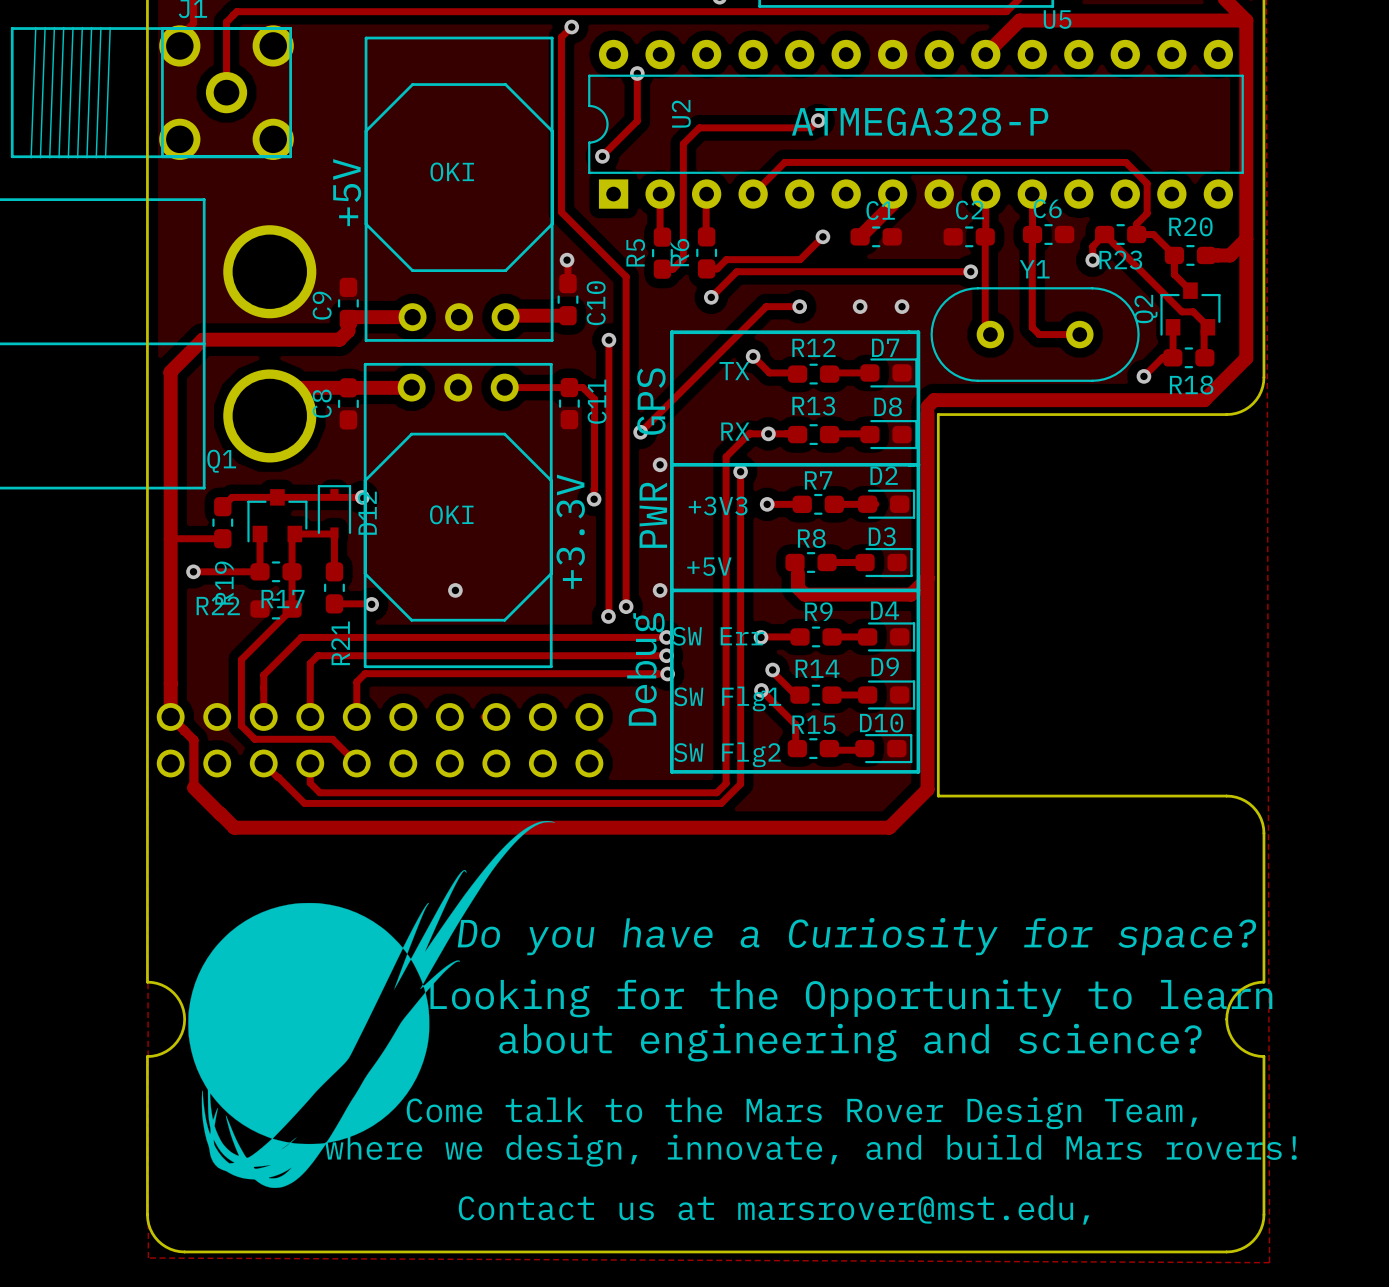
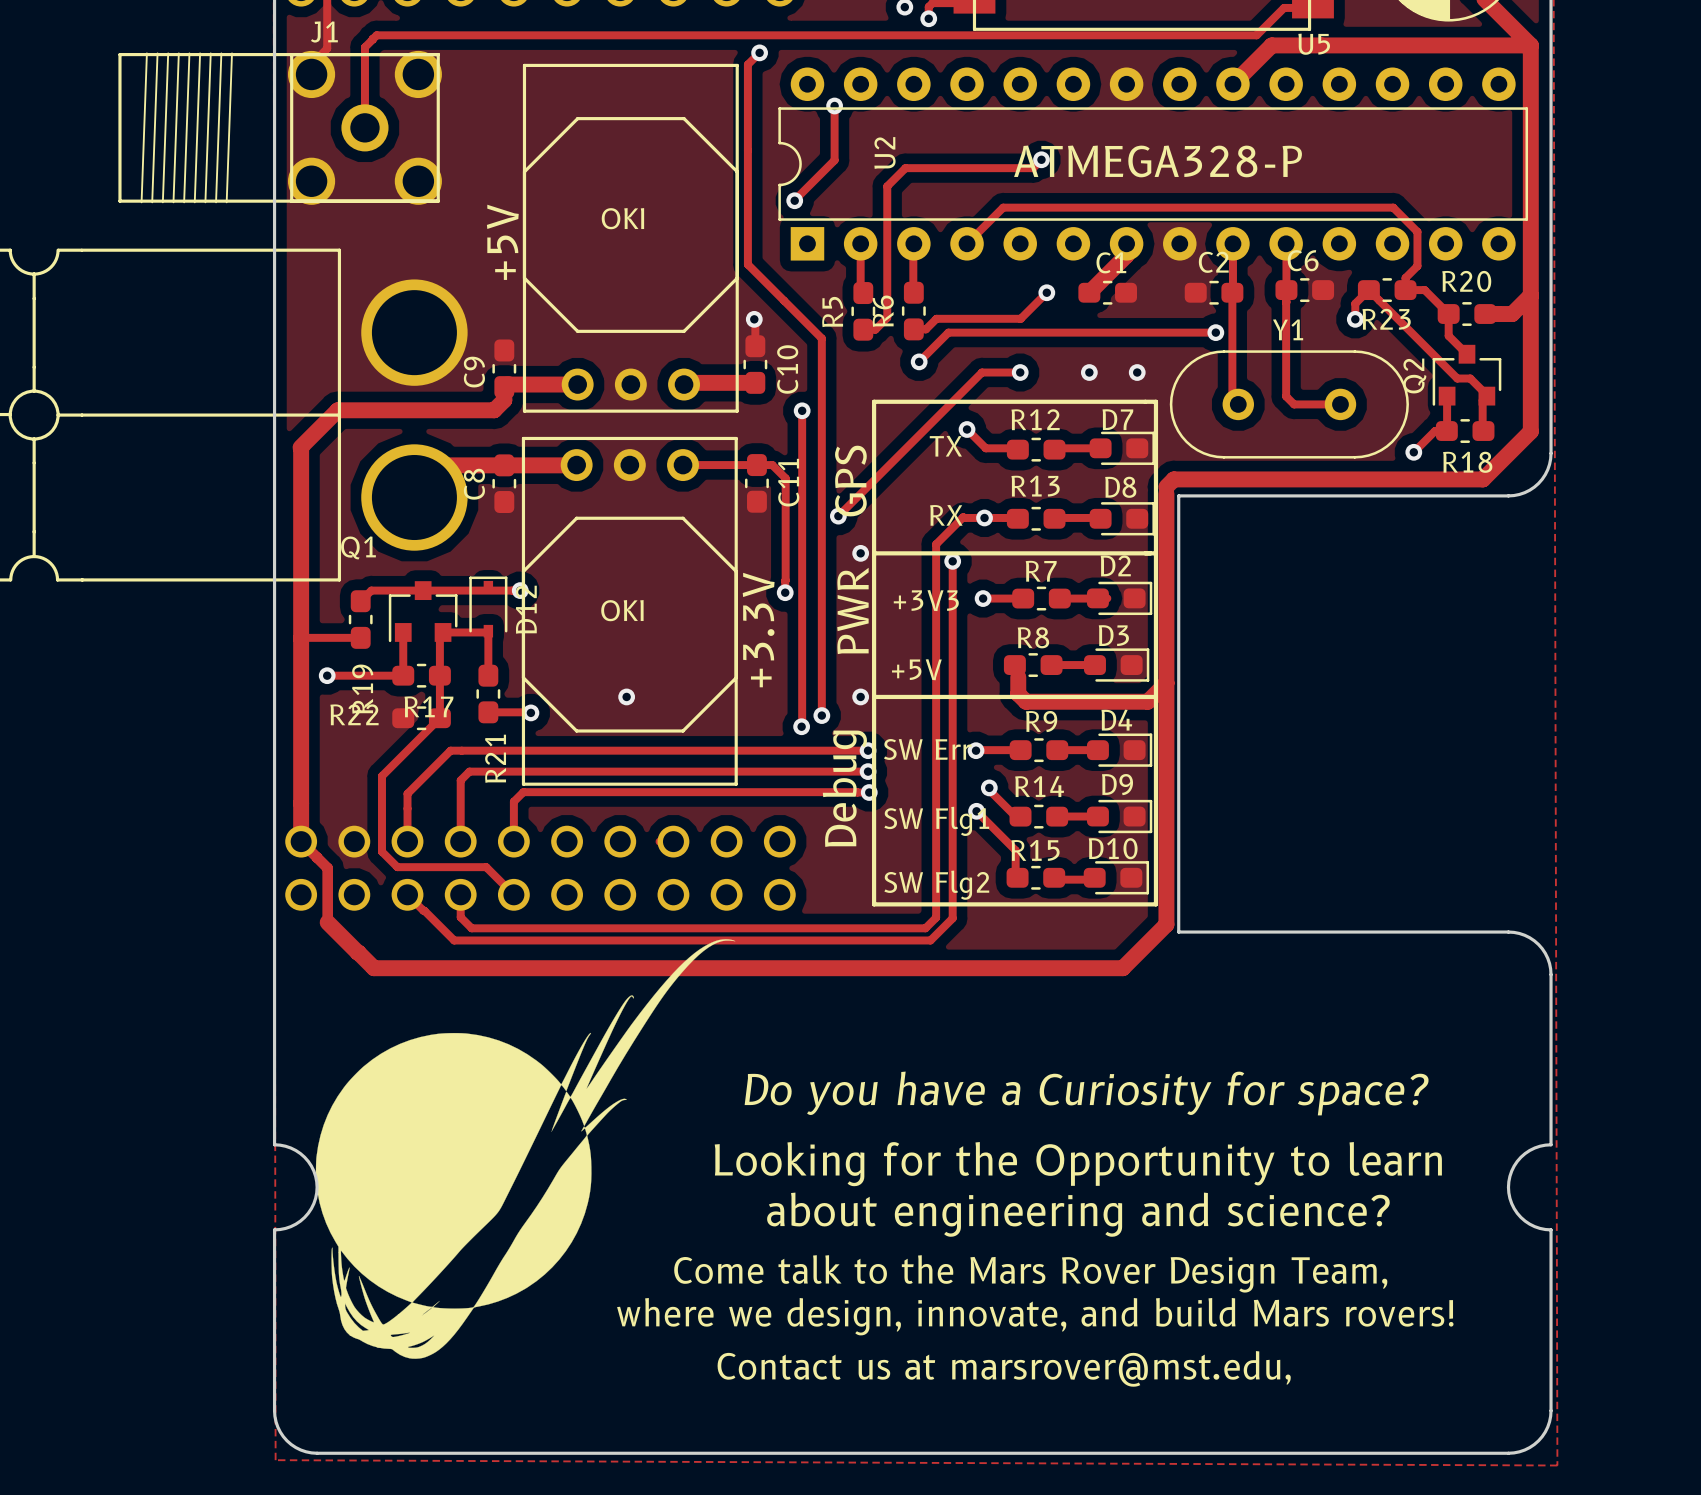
drawing position: (371, 1004) -> (525, 1149)
text position: Come talk to the Mars Rover Design Team, (801, 1113) -> Come talk to the Mars Rover Design Team, (1030, 1273)
text position: where we design, innovate, and build Mars rovers! (811, 1150) -> where we design, innovate, and build Mars rovers! (1035, 1316)
text position: Contact us at marsrover@mst.edu, (774, 1209) -> Contact us at marsrover@mst.edu, (1004, 1368)

